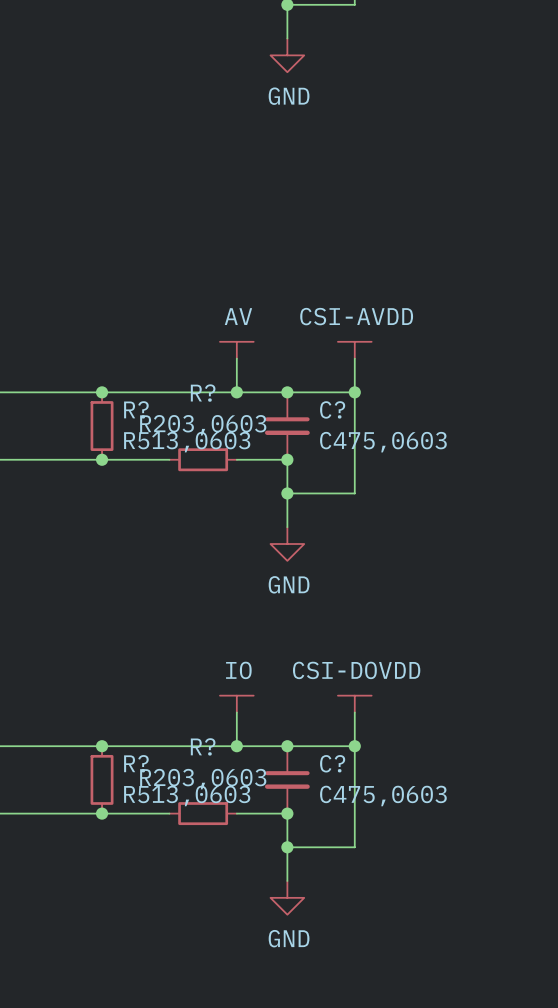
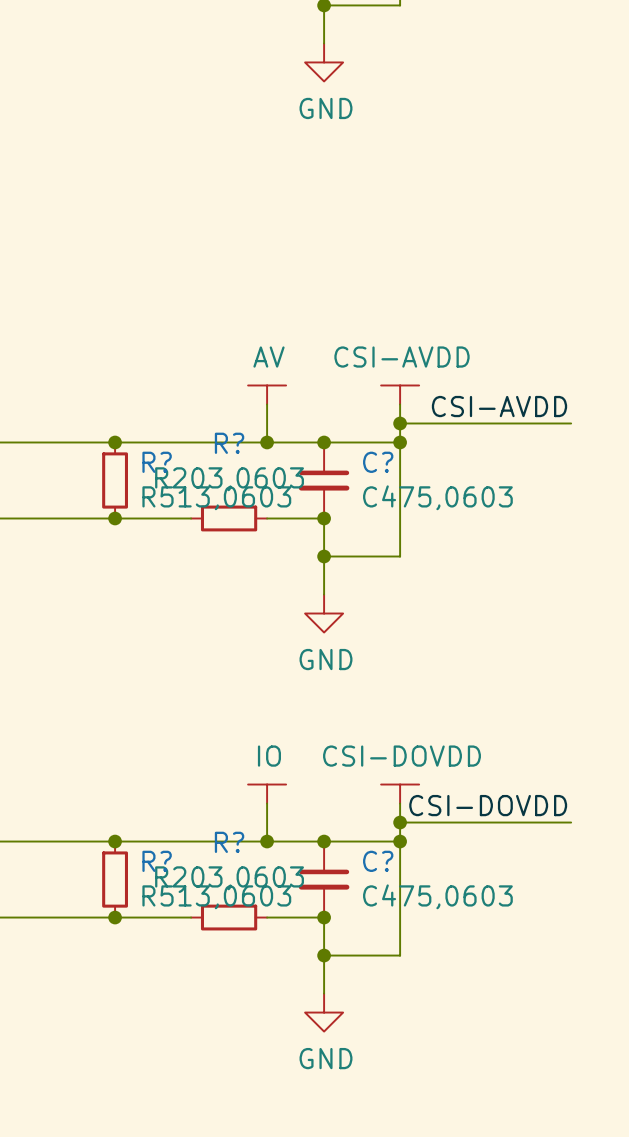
label: none -> CSI-AVDD (499, 406)
wire: none -> (400, 423) (571, 423)
junction: none -> (400, 423)
label: none -> CSI-DOVDD (488, 805)
wire: none -> (400, 822) (571, 822)
junction: none -> (400, 822)

